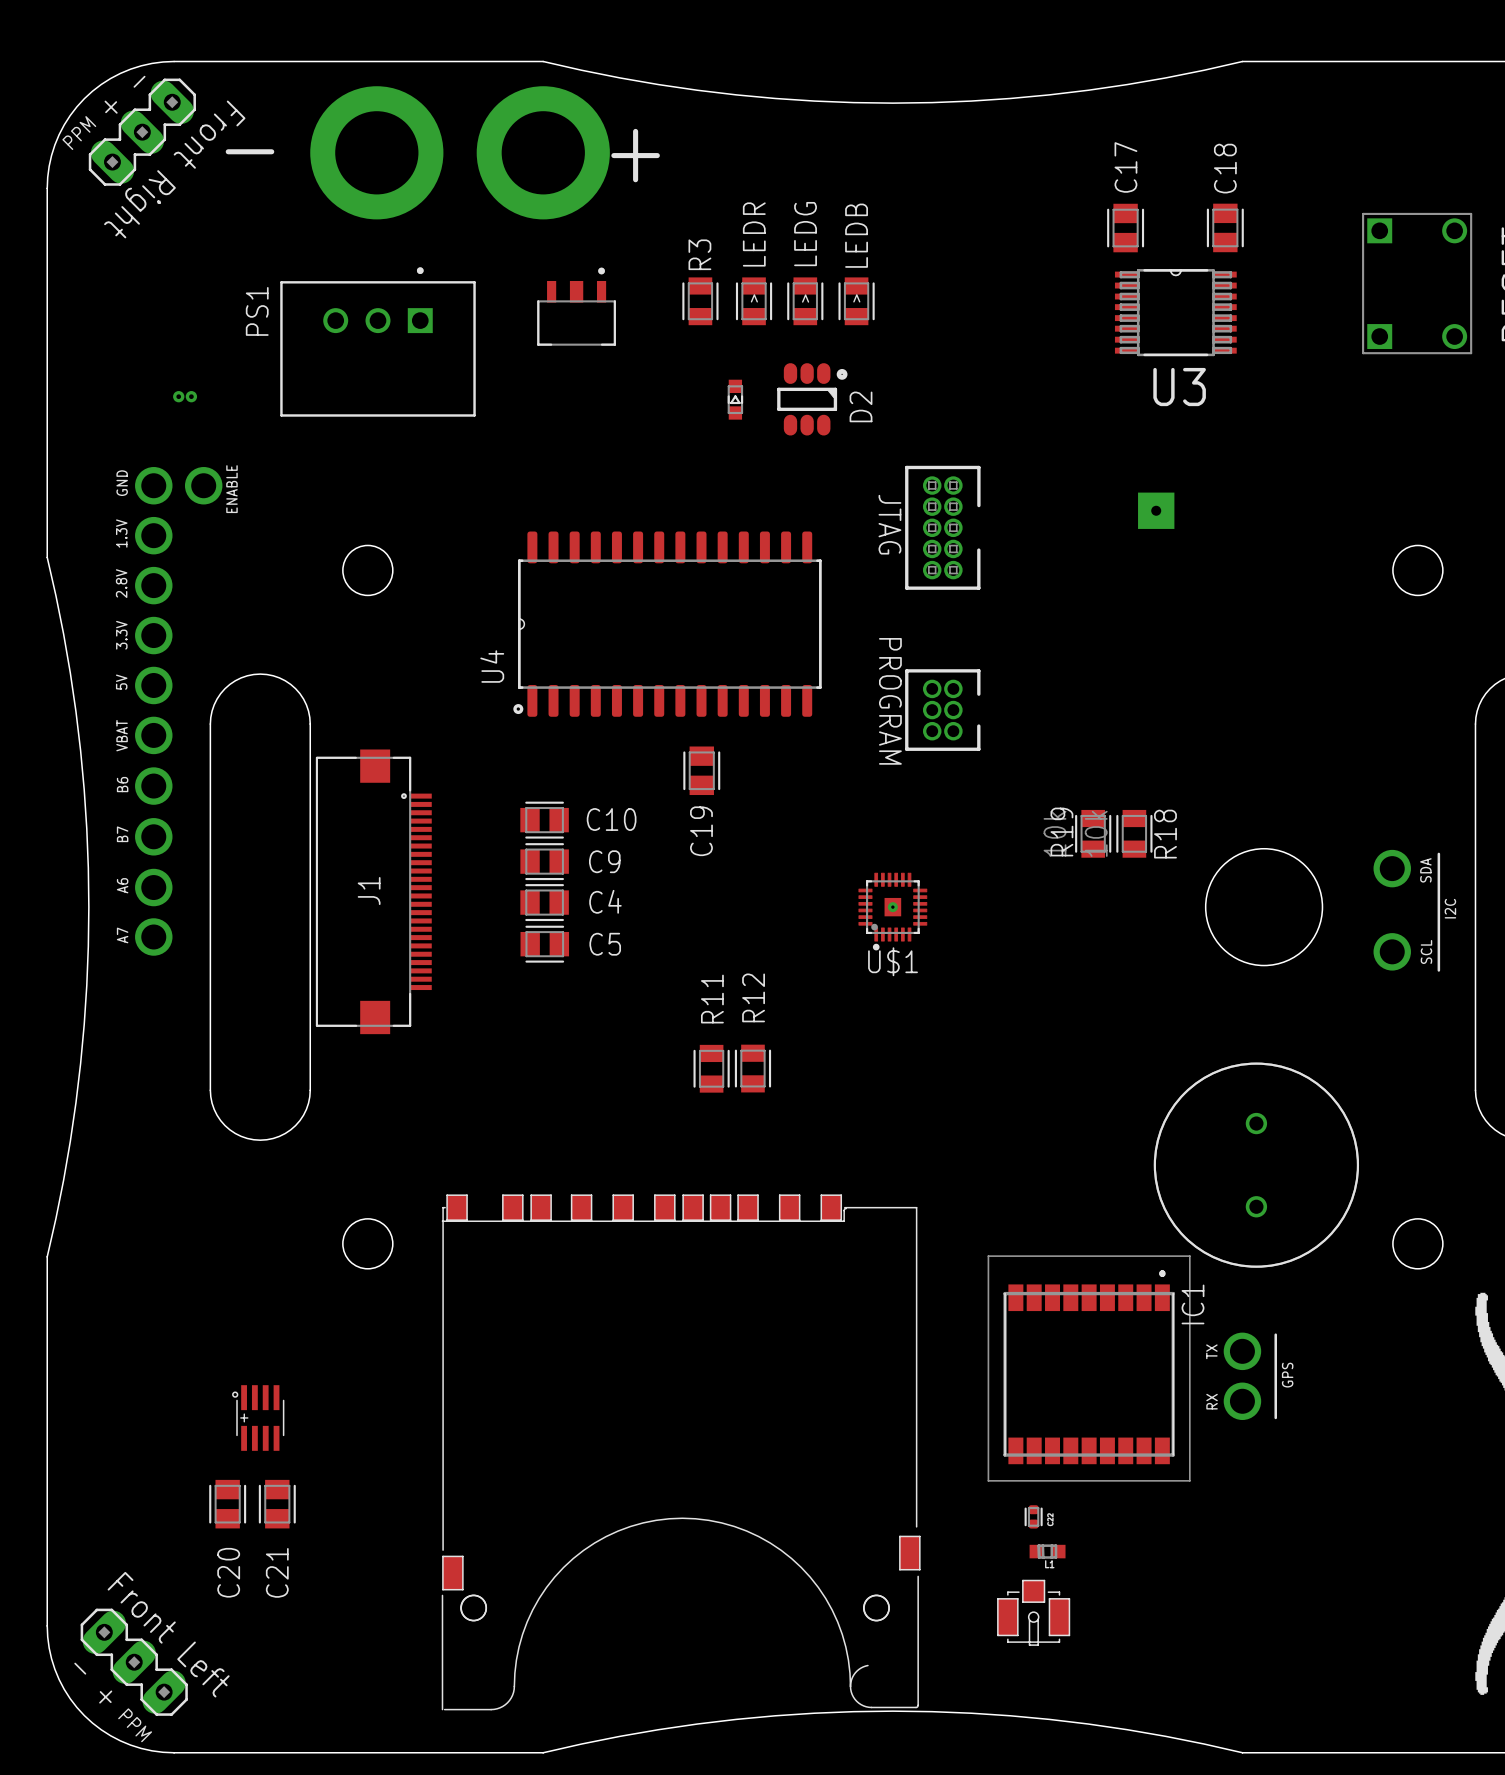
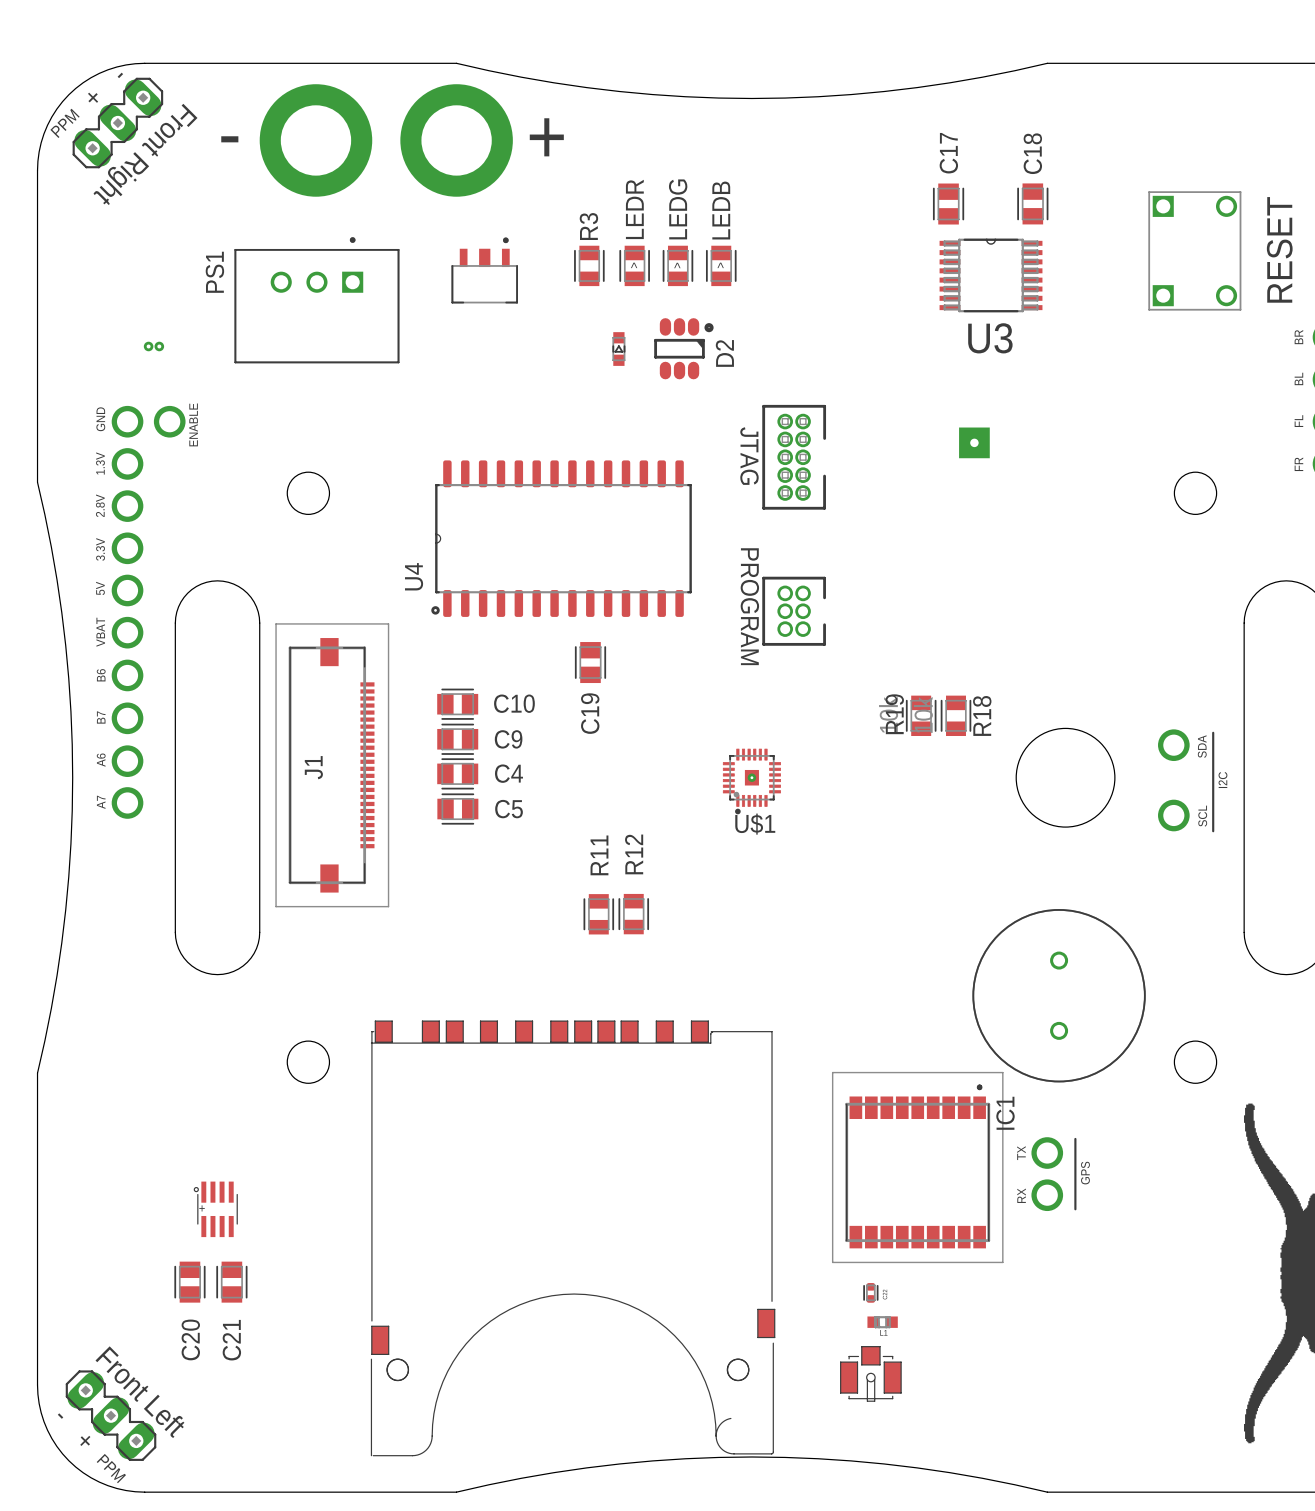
J1 footprint: [315, 749, 432, 1035] -> [275, 623, 390, 908]

